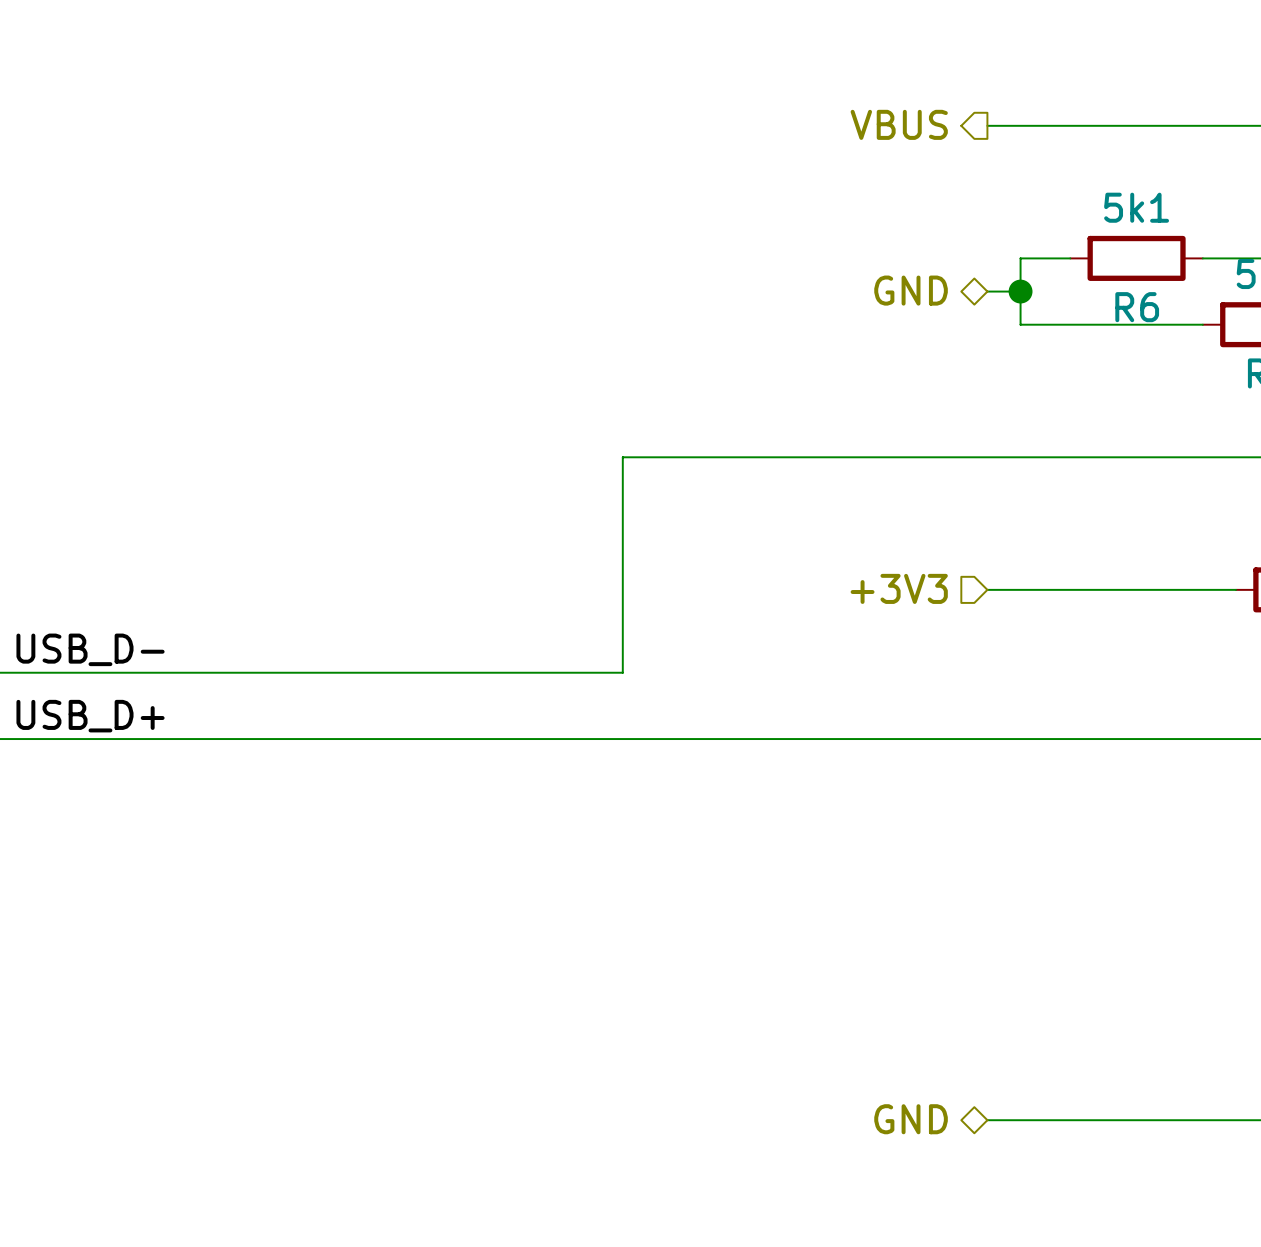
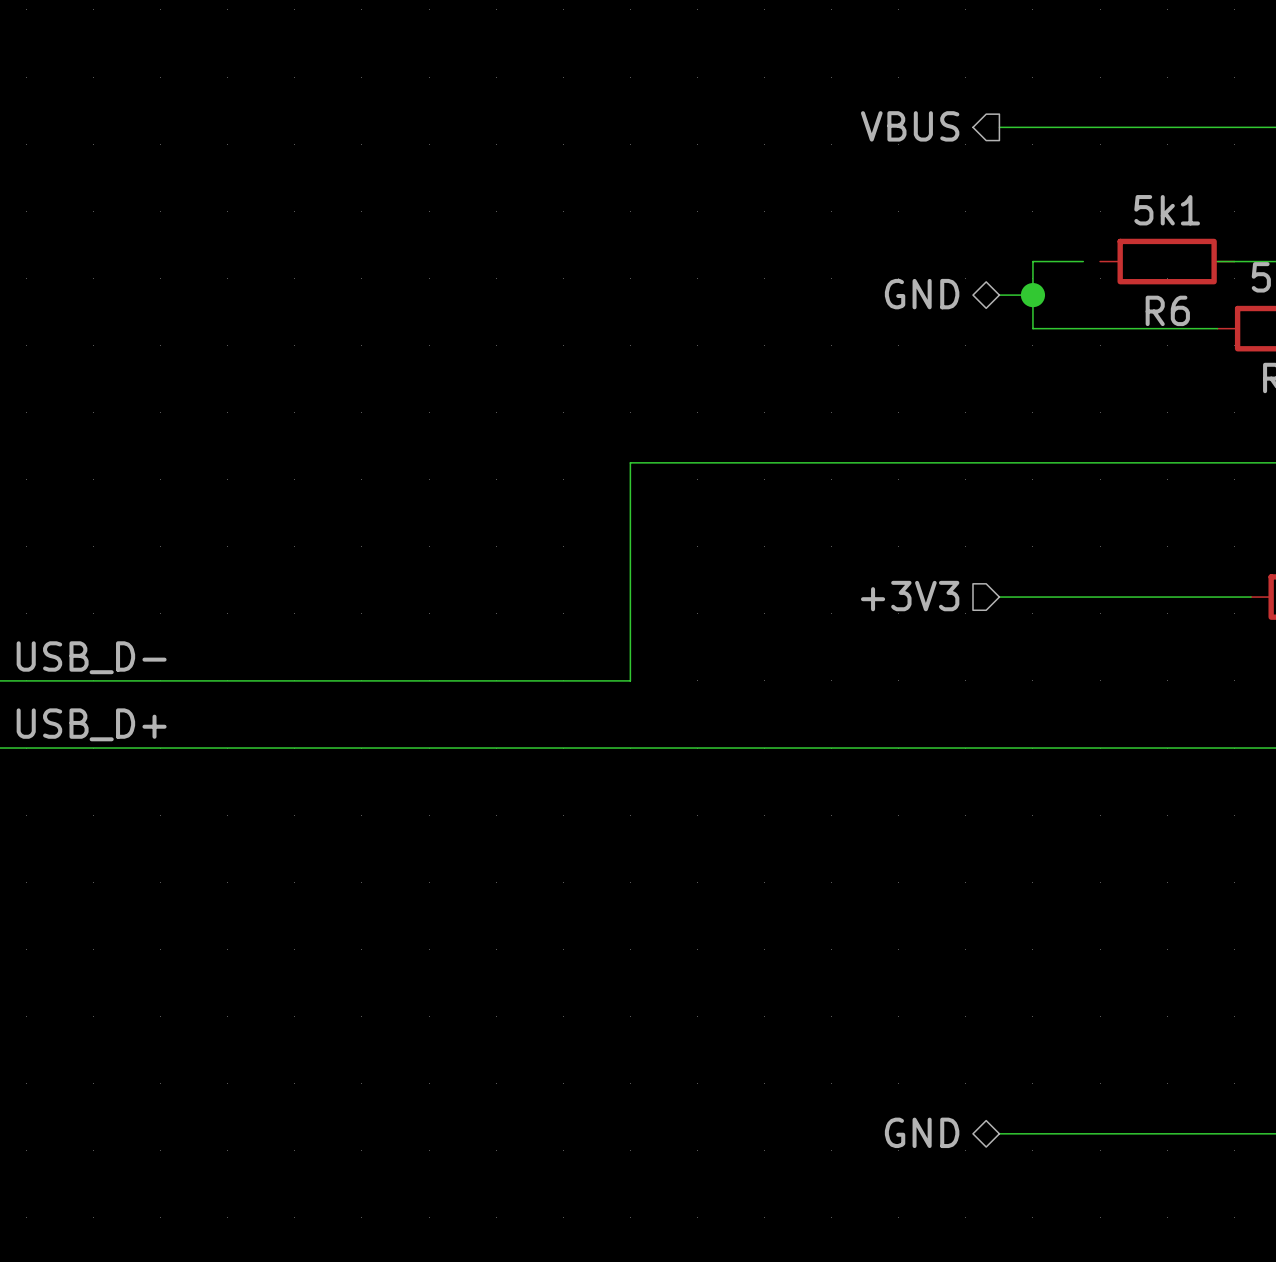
R6 position: (1136, 258) -> (1167, 261)

